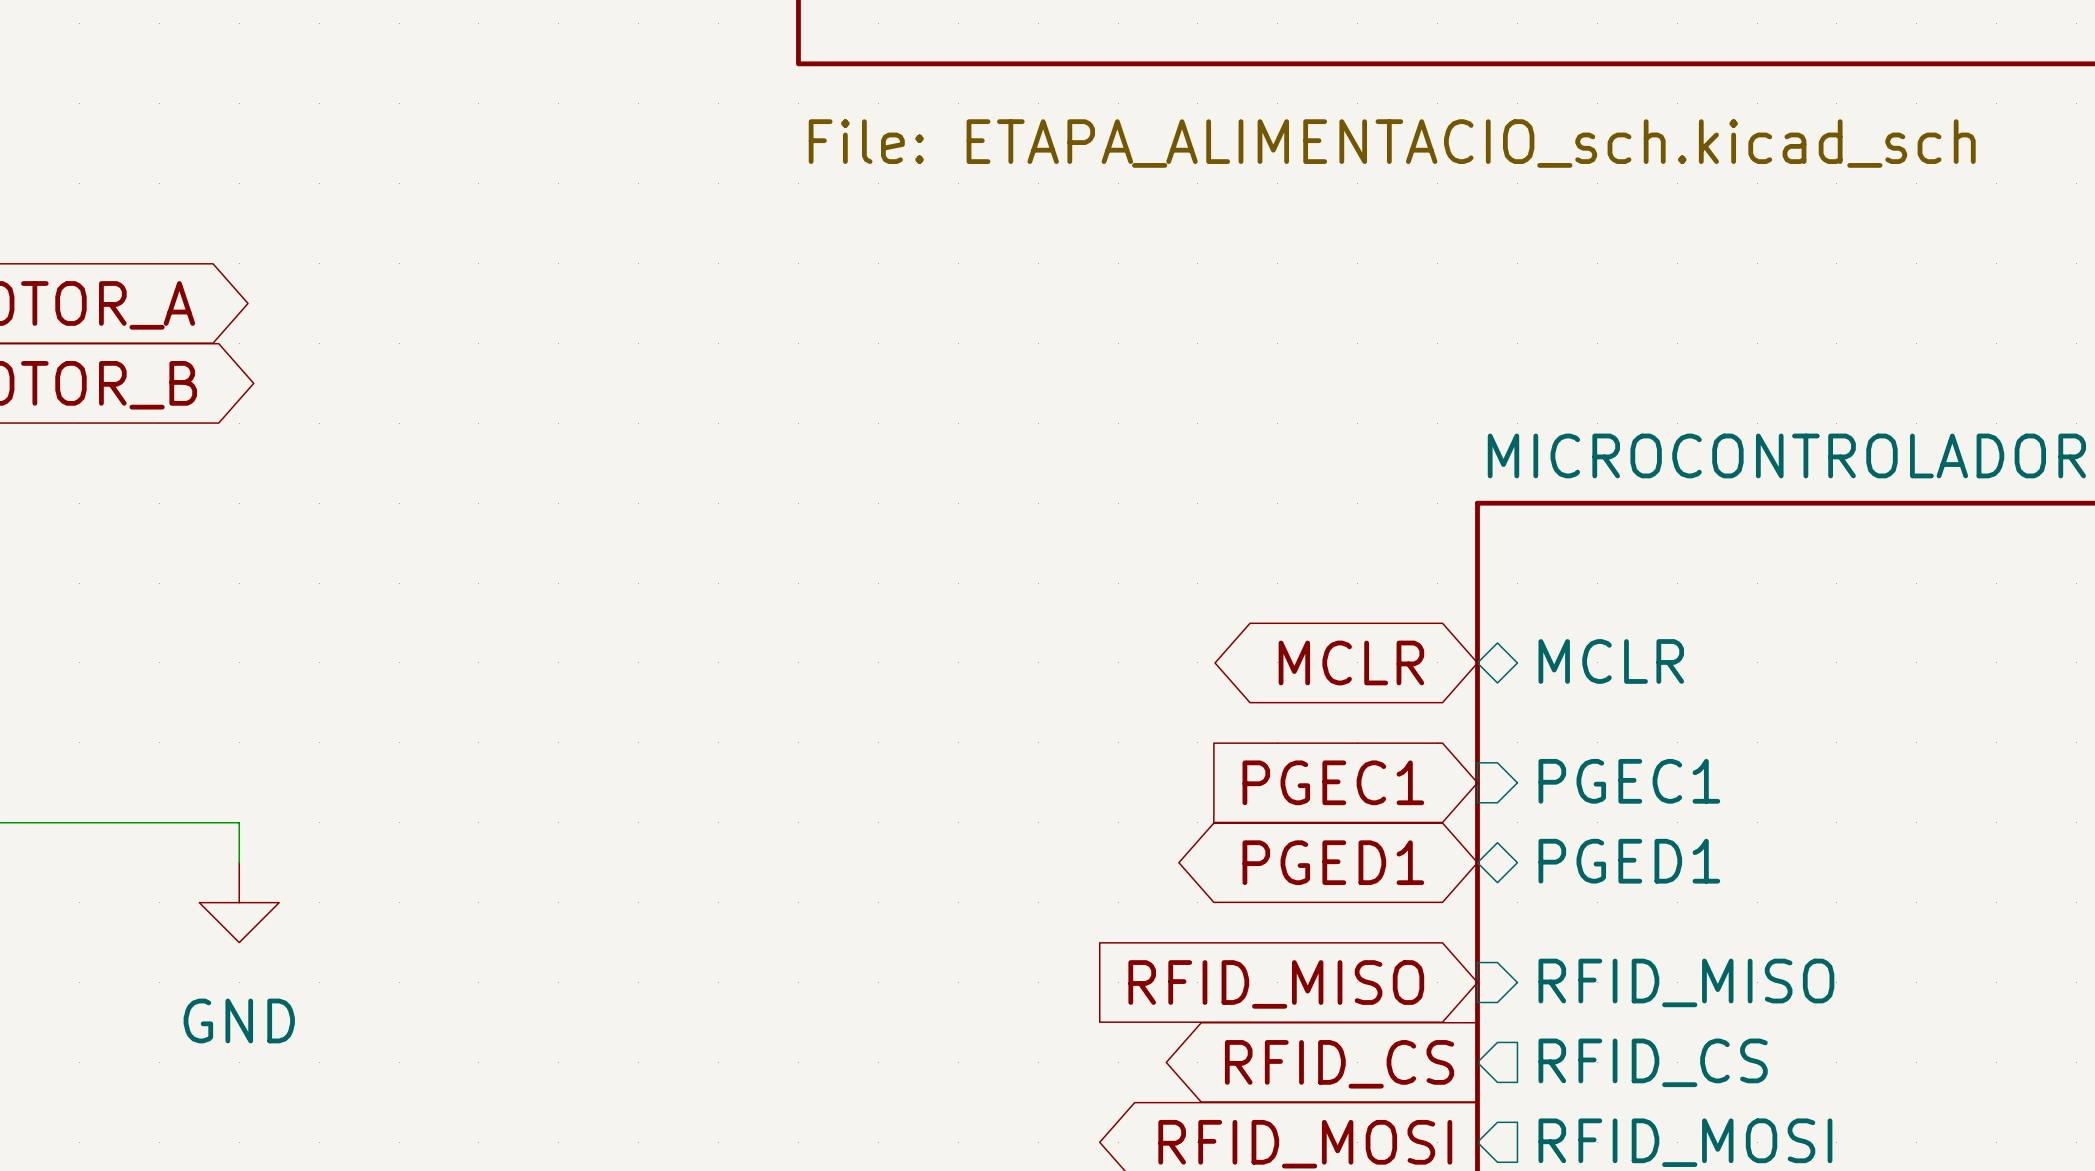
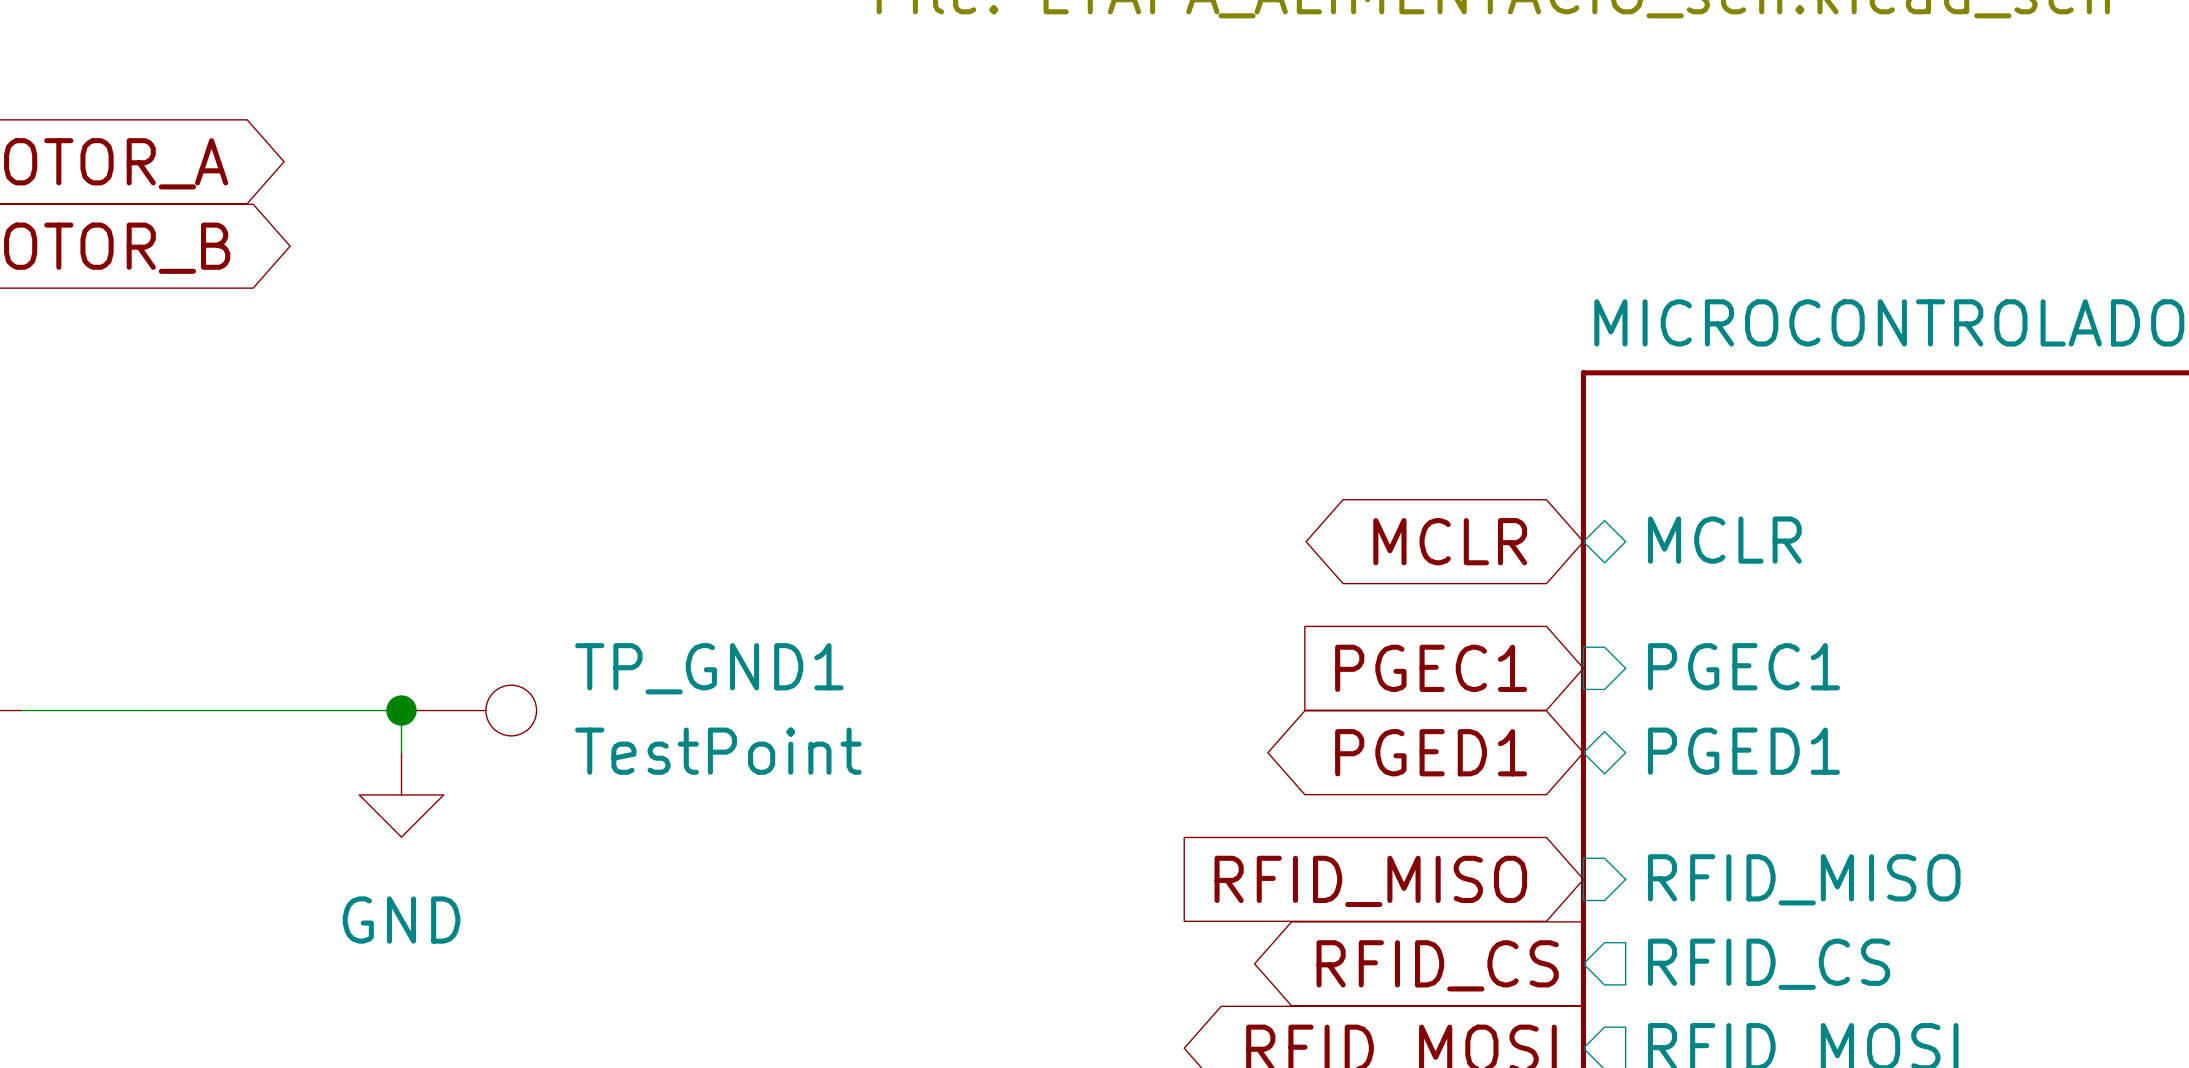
wire: (239, 822) (239, 862) -> (274, 710) (401, 710) (401, 752)
junction: none -> (401, 710)
TP_GND1: none -> TestPoint (469, 710)
power symbol position: GND (239, 902) -> GND (401, 794)

